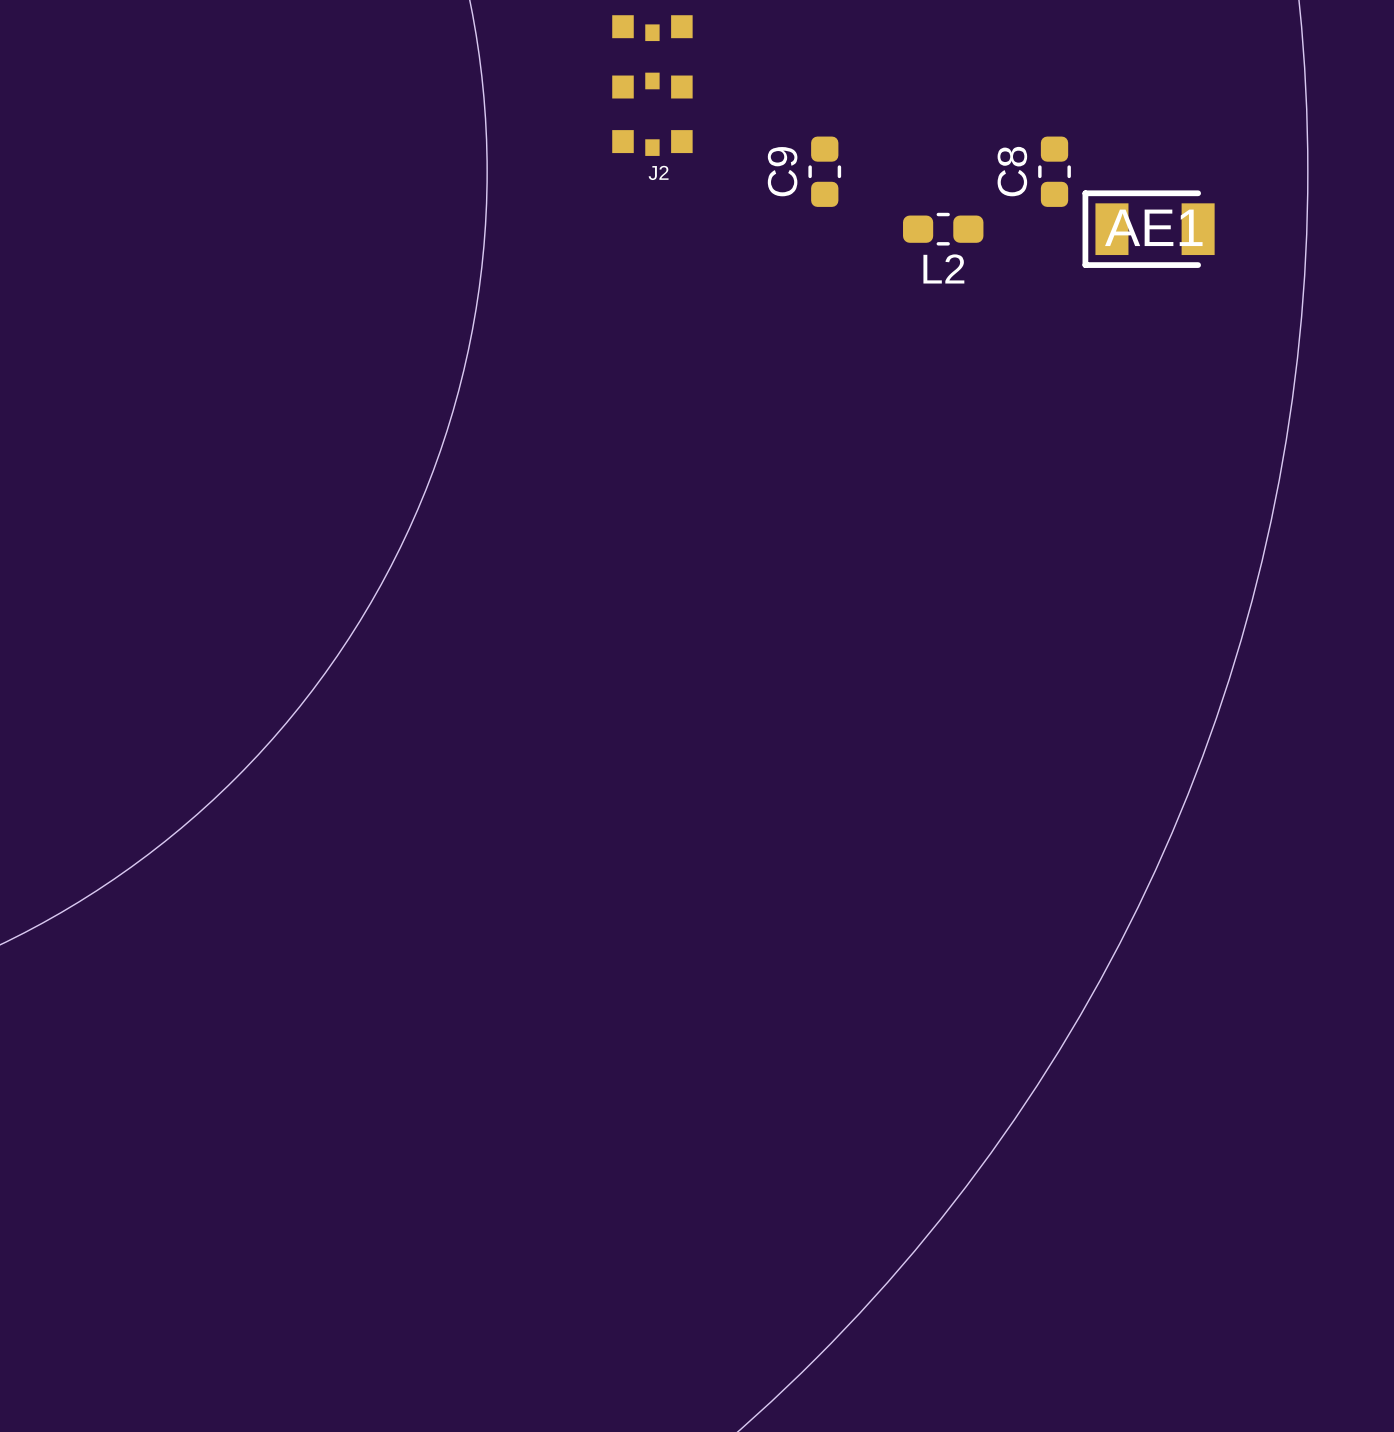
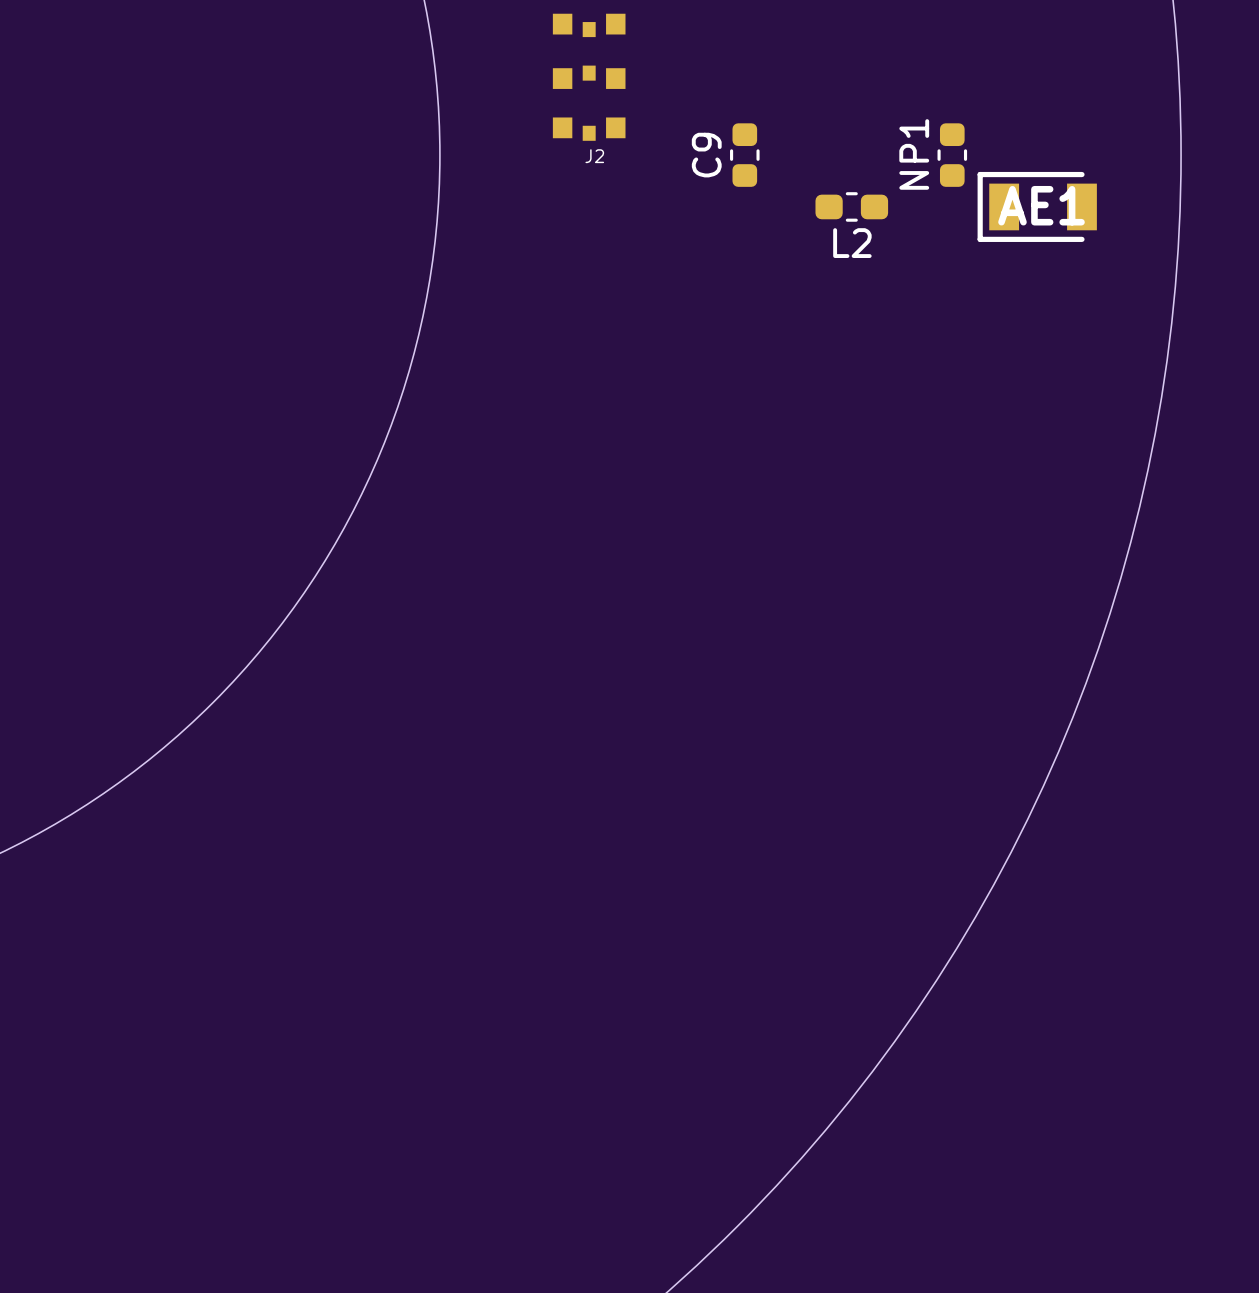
C8 name: C8 (1012, 171) -> NP1 (914, 154)

